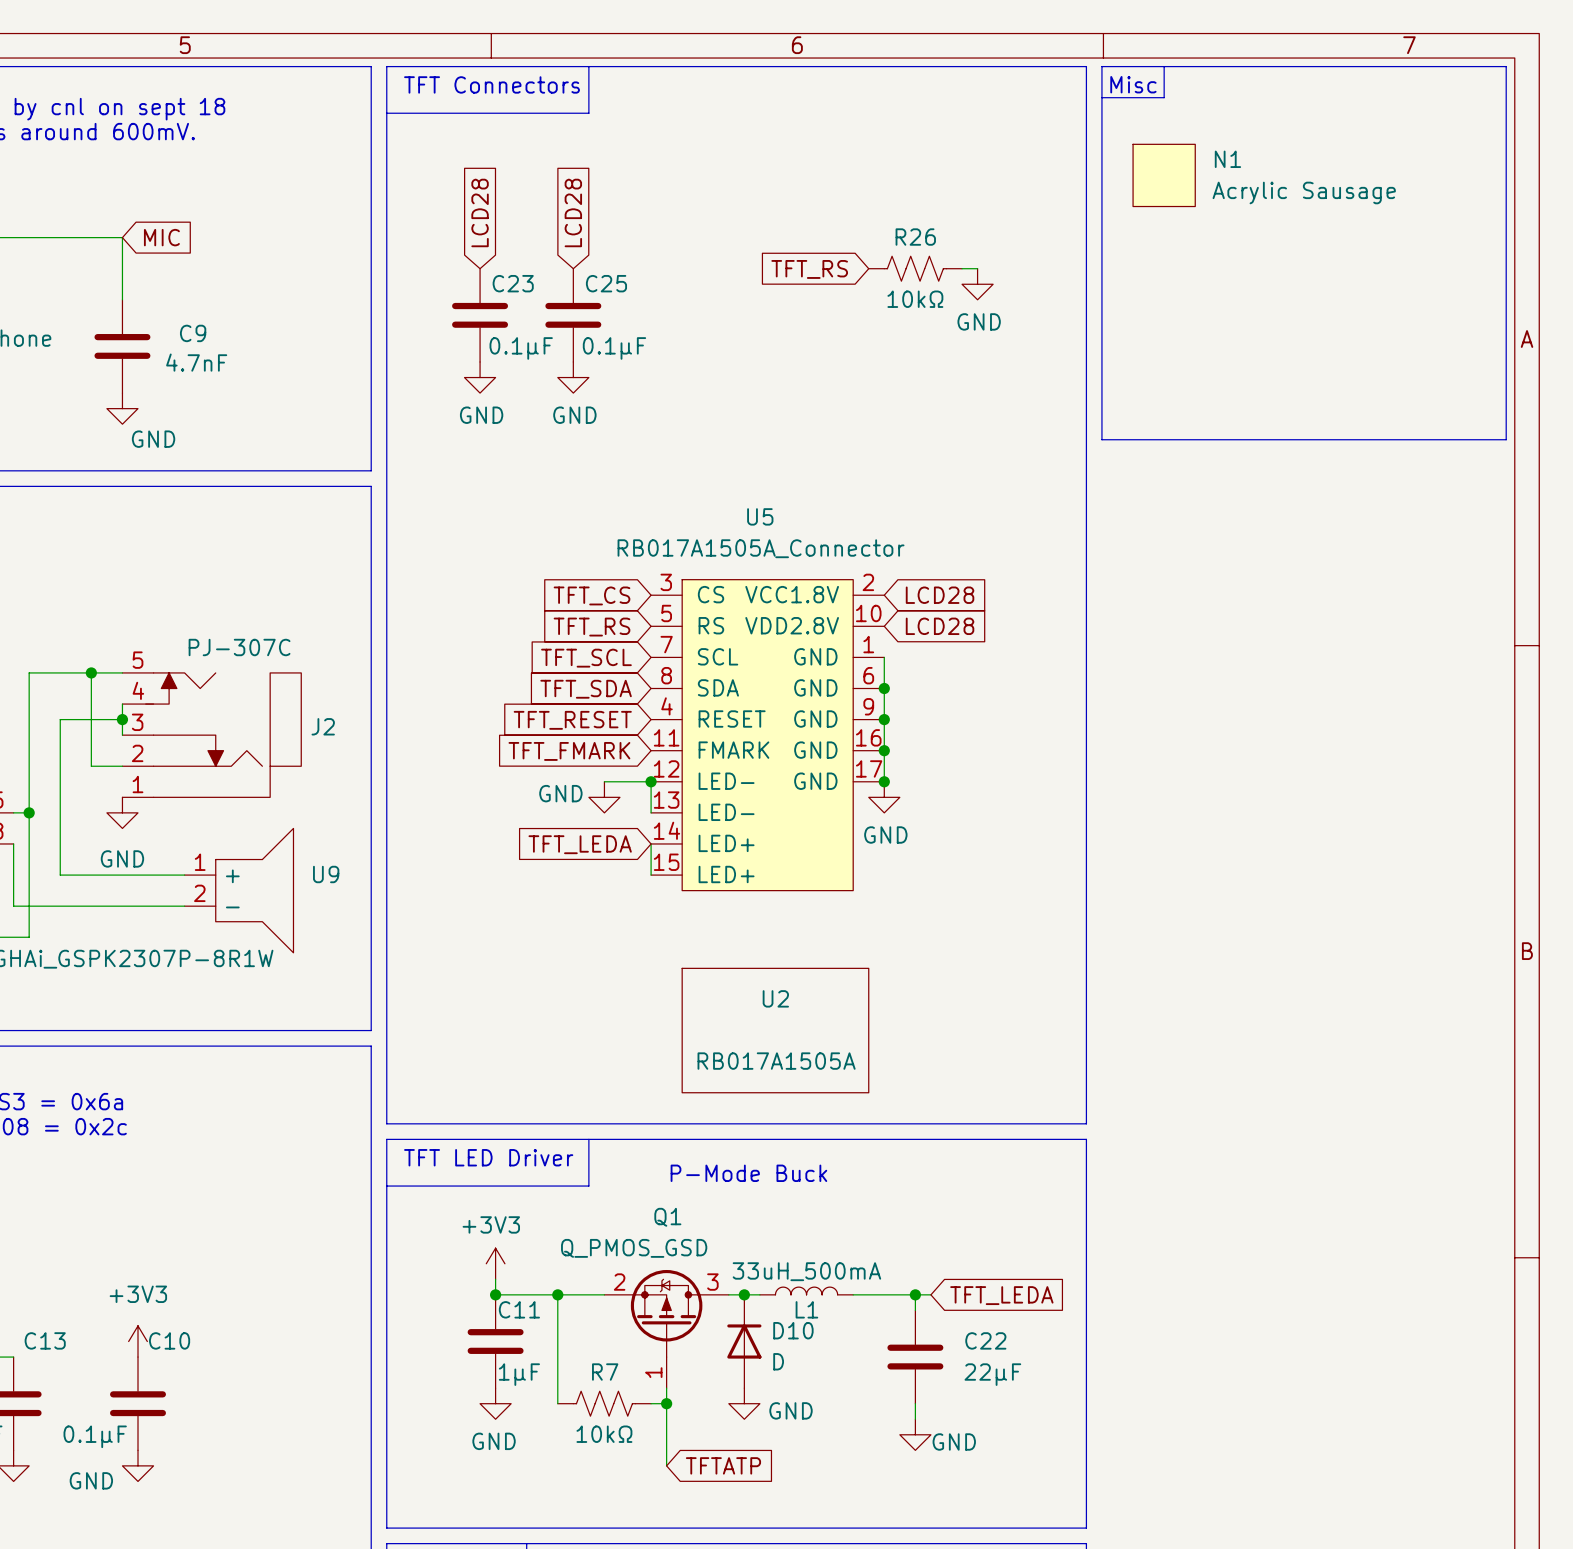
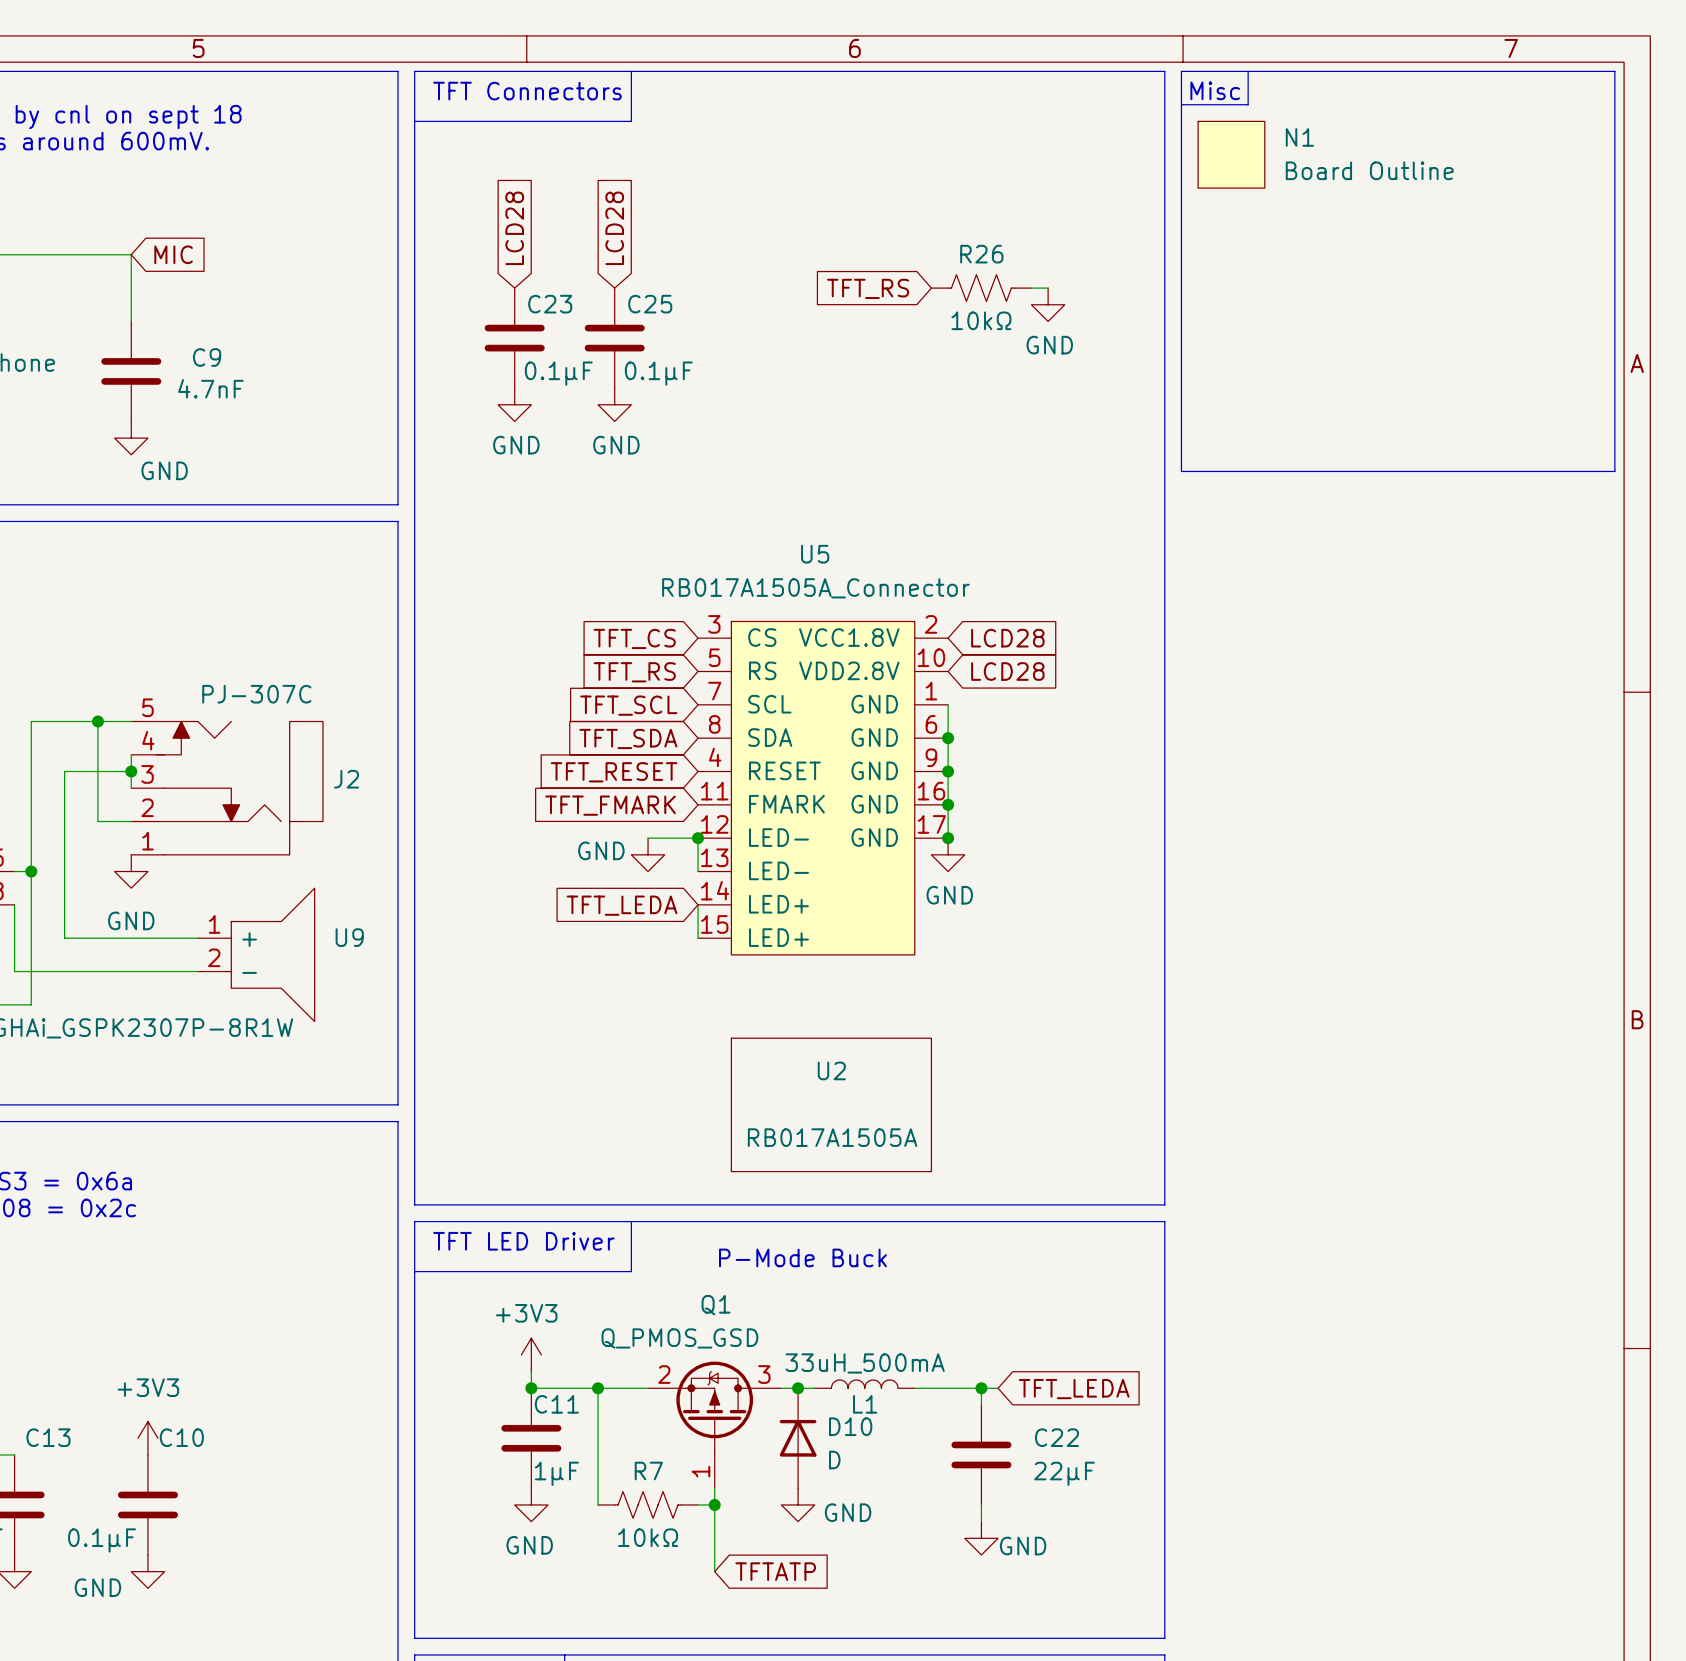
N1 position: (1164, 175) -> (1231, 154)
N1 value: Acrylic Sausage (1304, 192) -> Board Outline (1369, 170)

